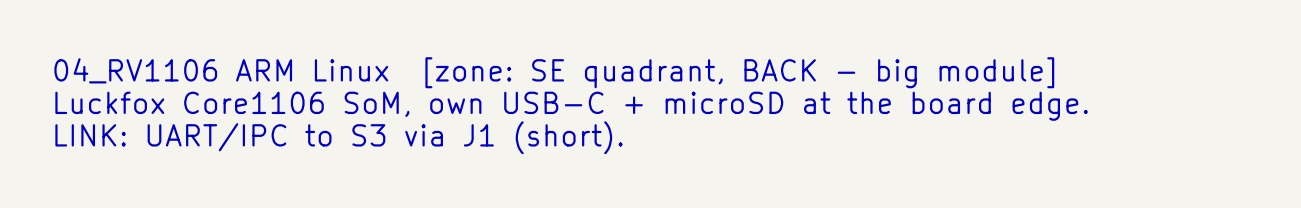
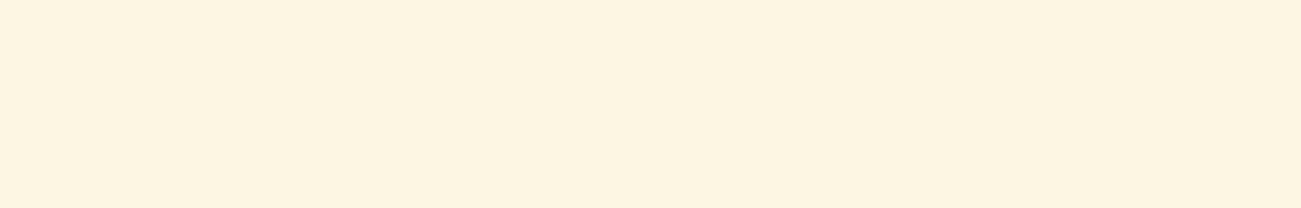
text: 04_RV1106 ARM Linux [zone: SE quadrant, BACK - big module] (554, 72) -> none
text: Luckfox Core1106 SoM, own USB-C + microSD at the board edge. (571, 106) -> none
text: LINK: UART/IPC to S3 via J1 (short). (339, 137) -> none

